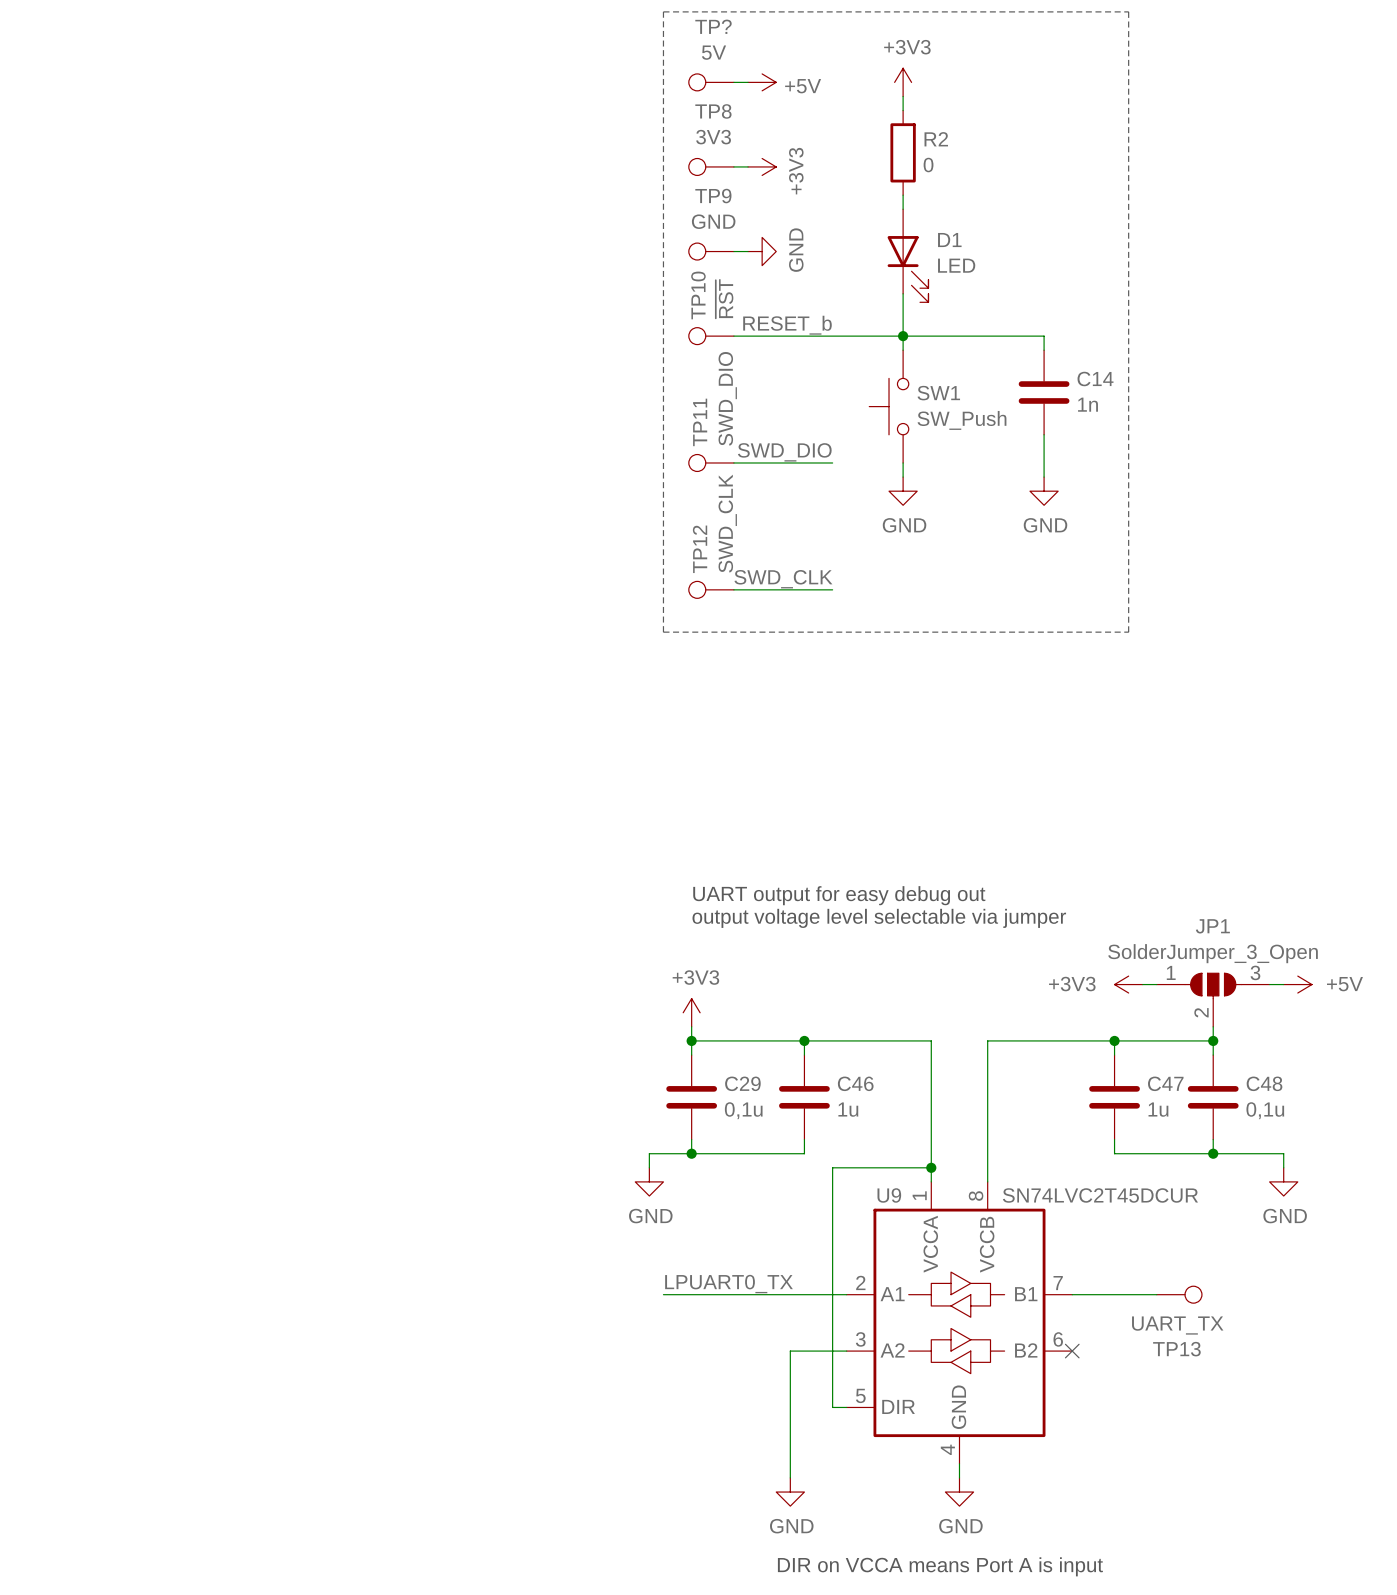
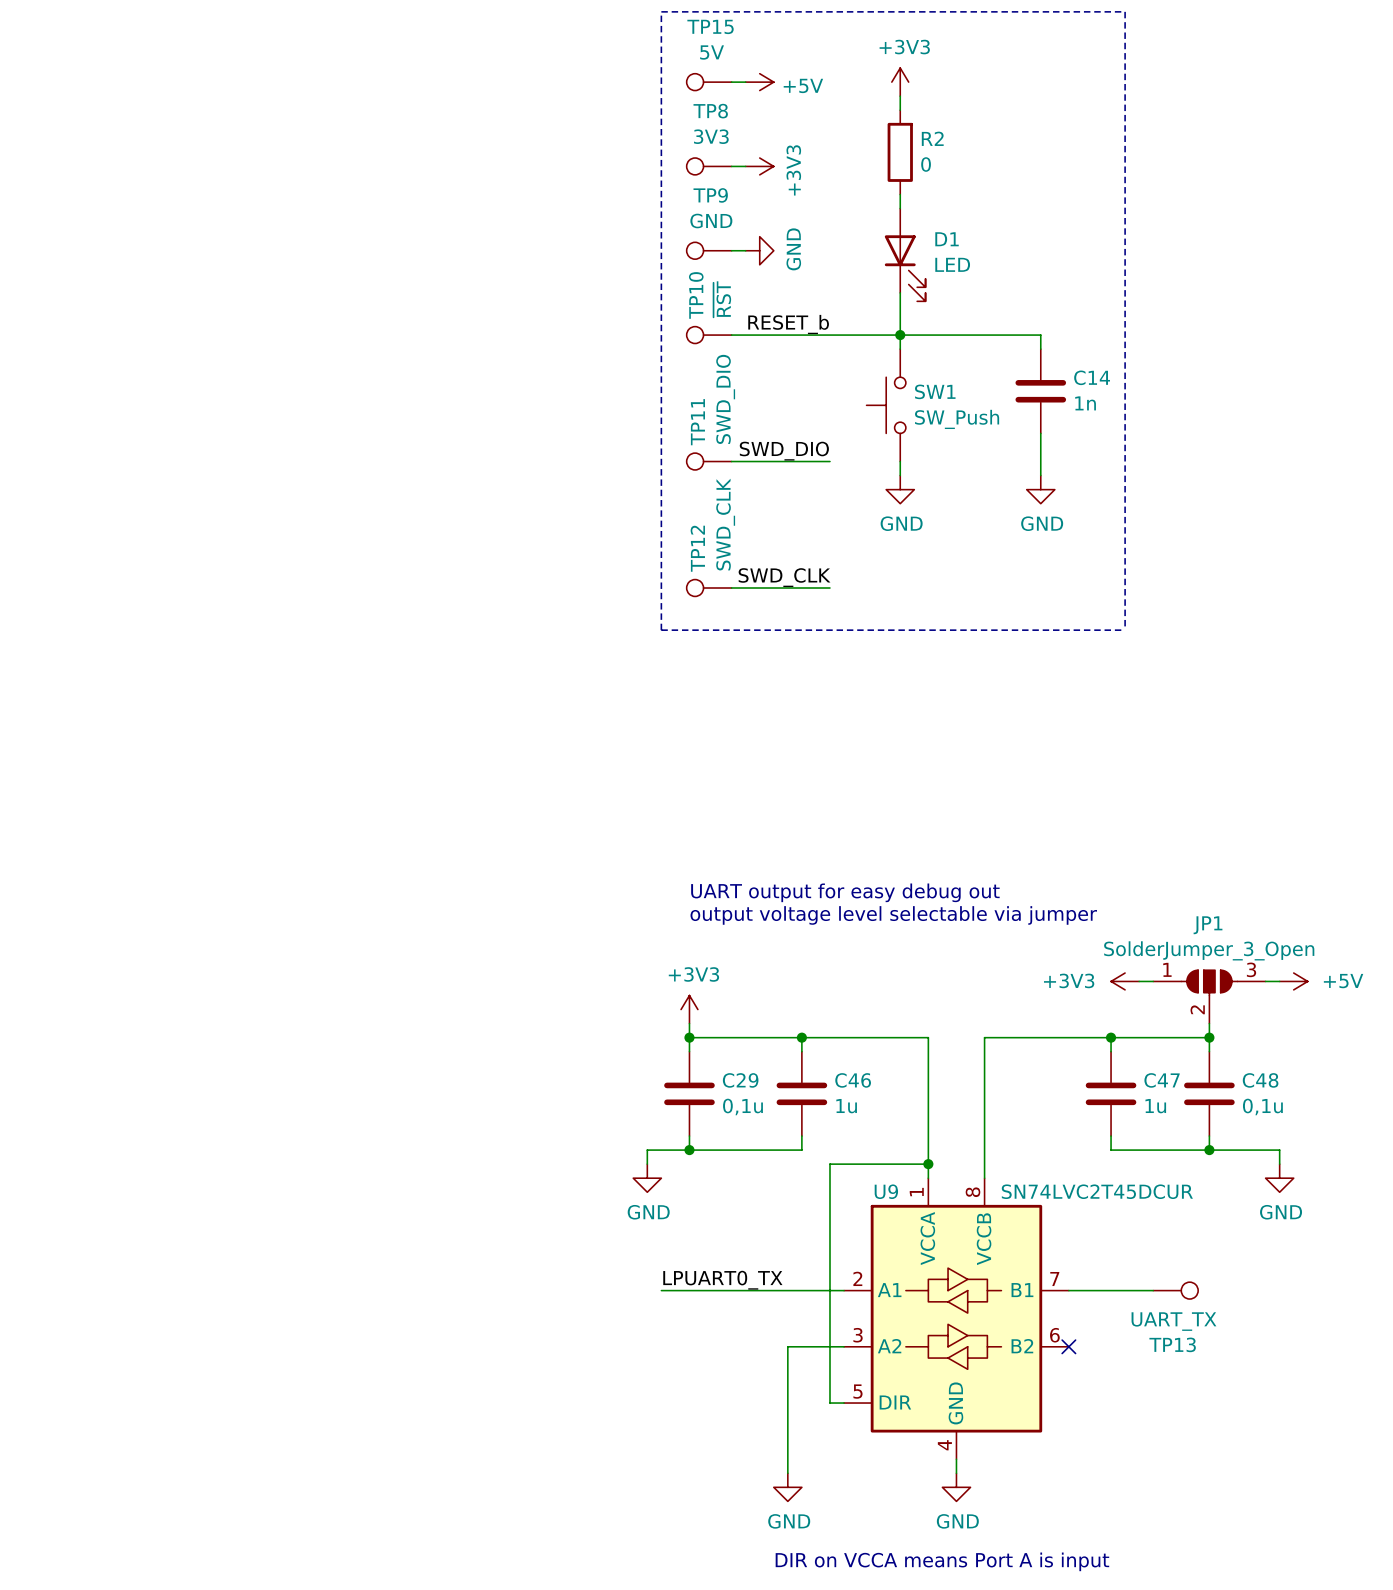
TP? name: TP? (713, 26) -> TP15 (710, 26)

